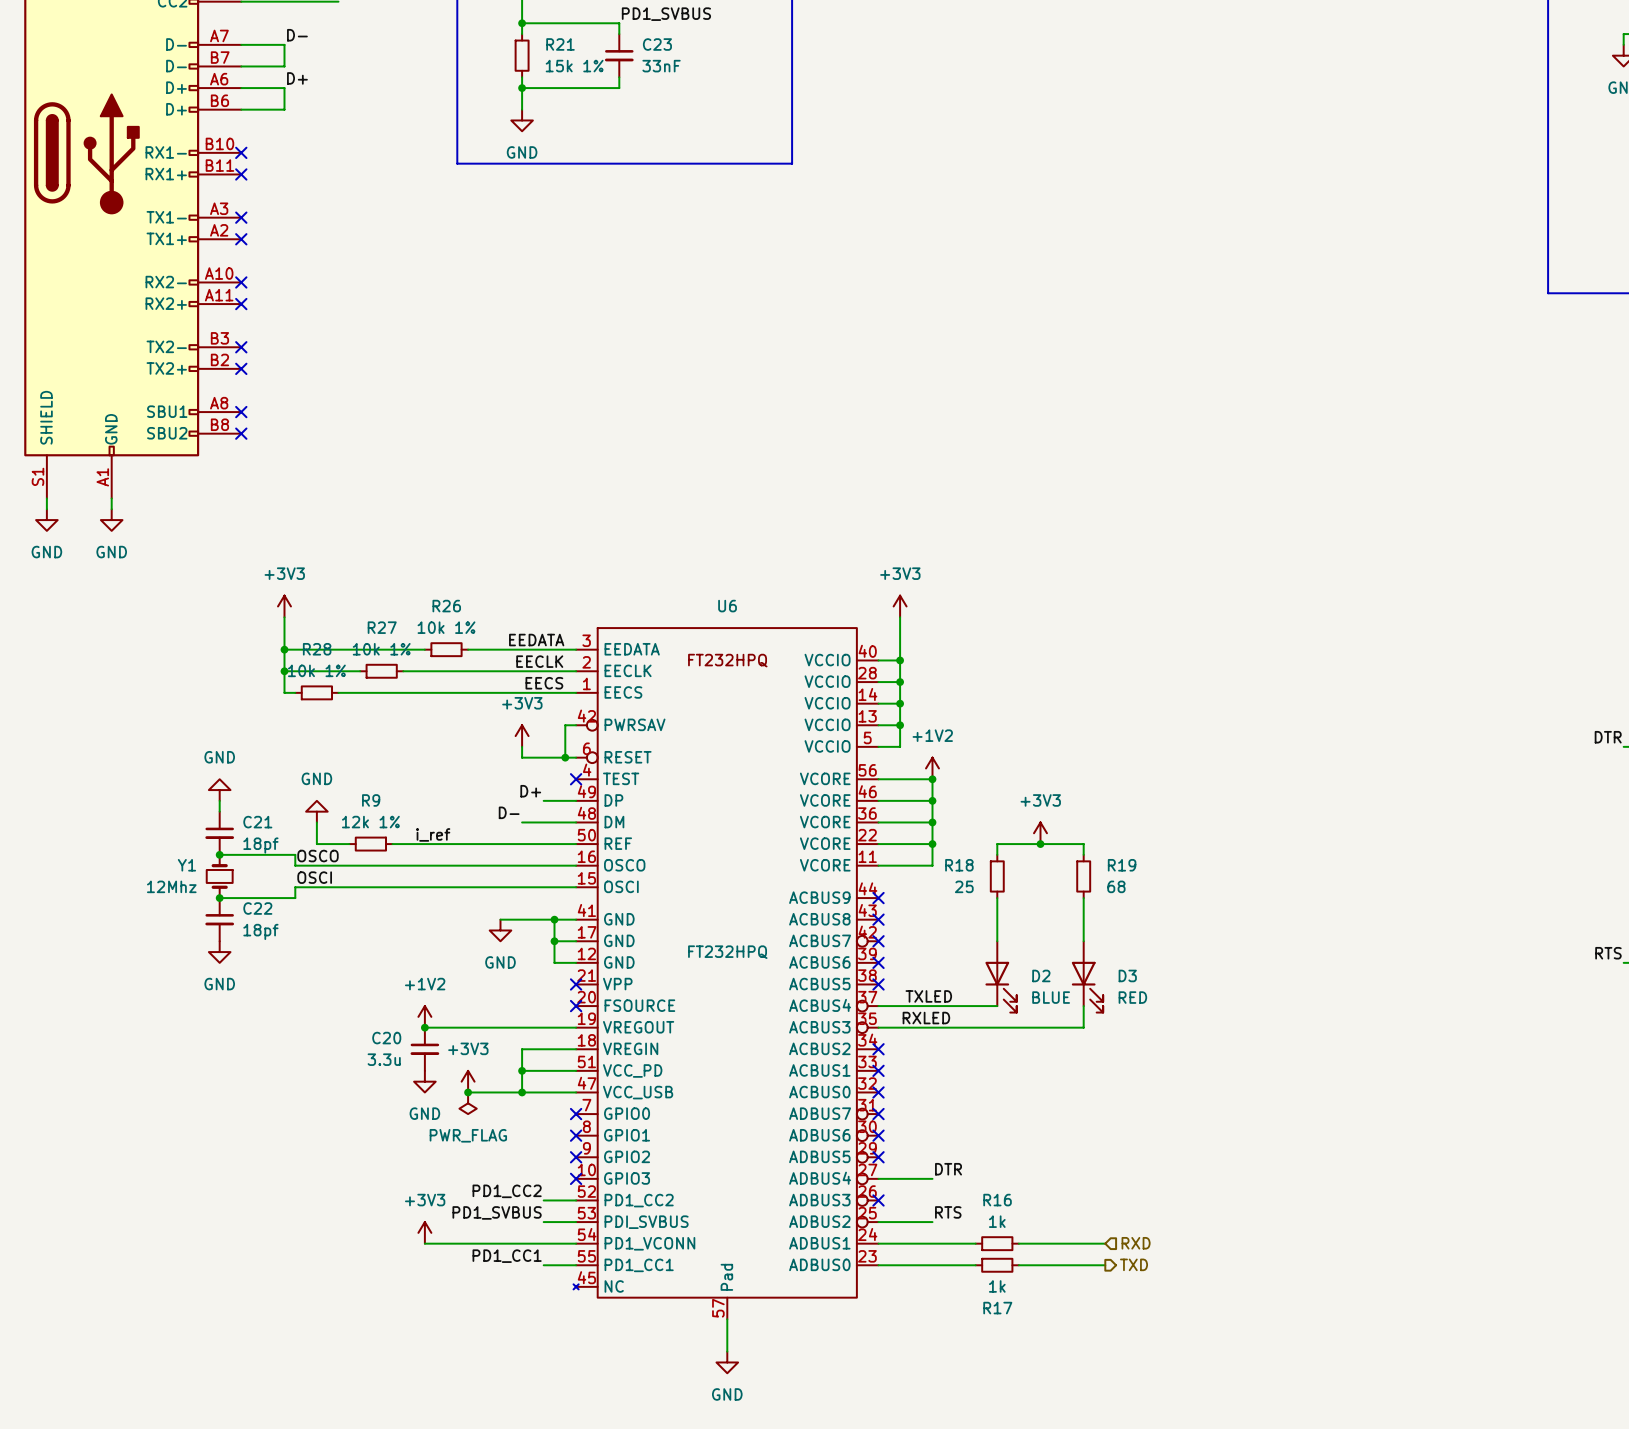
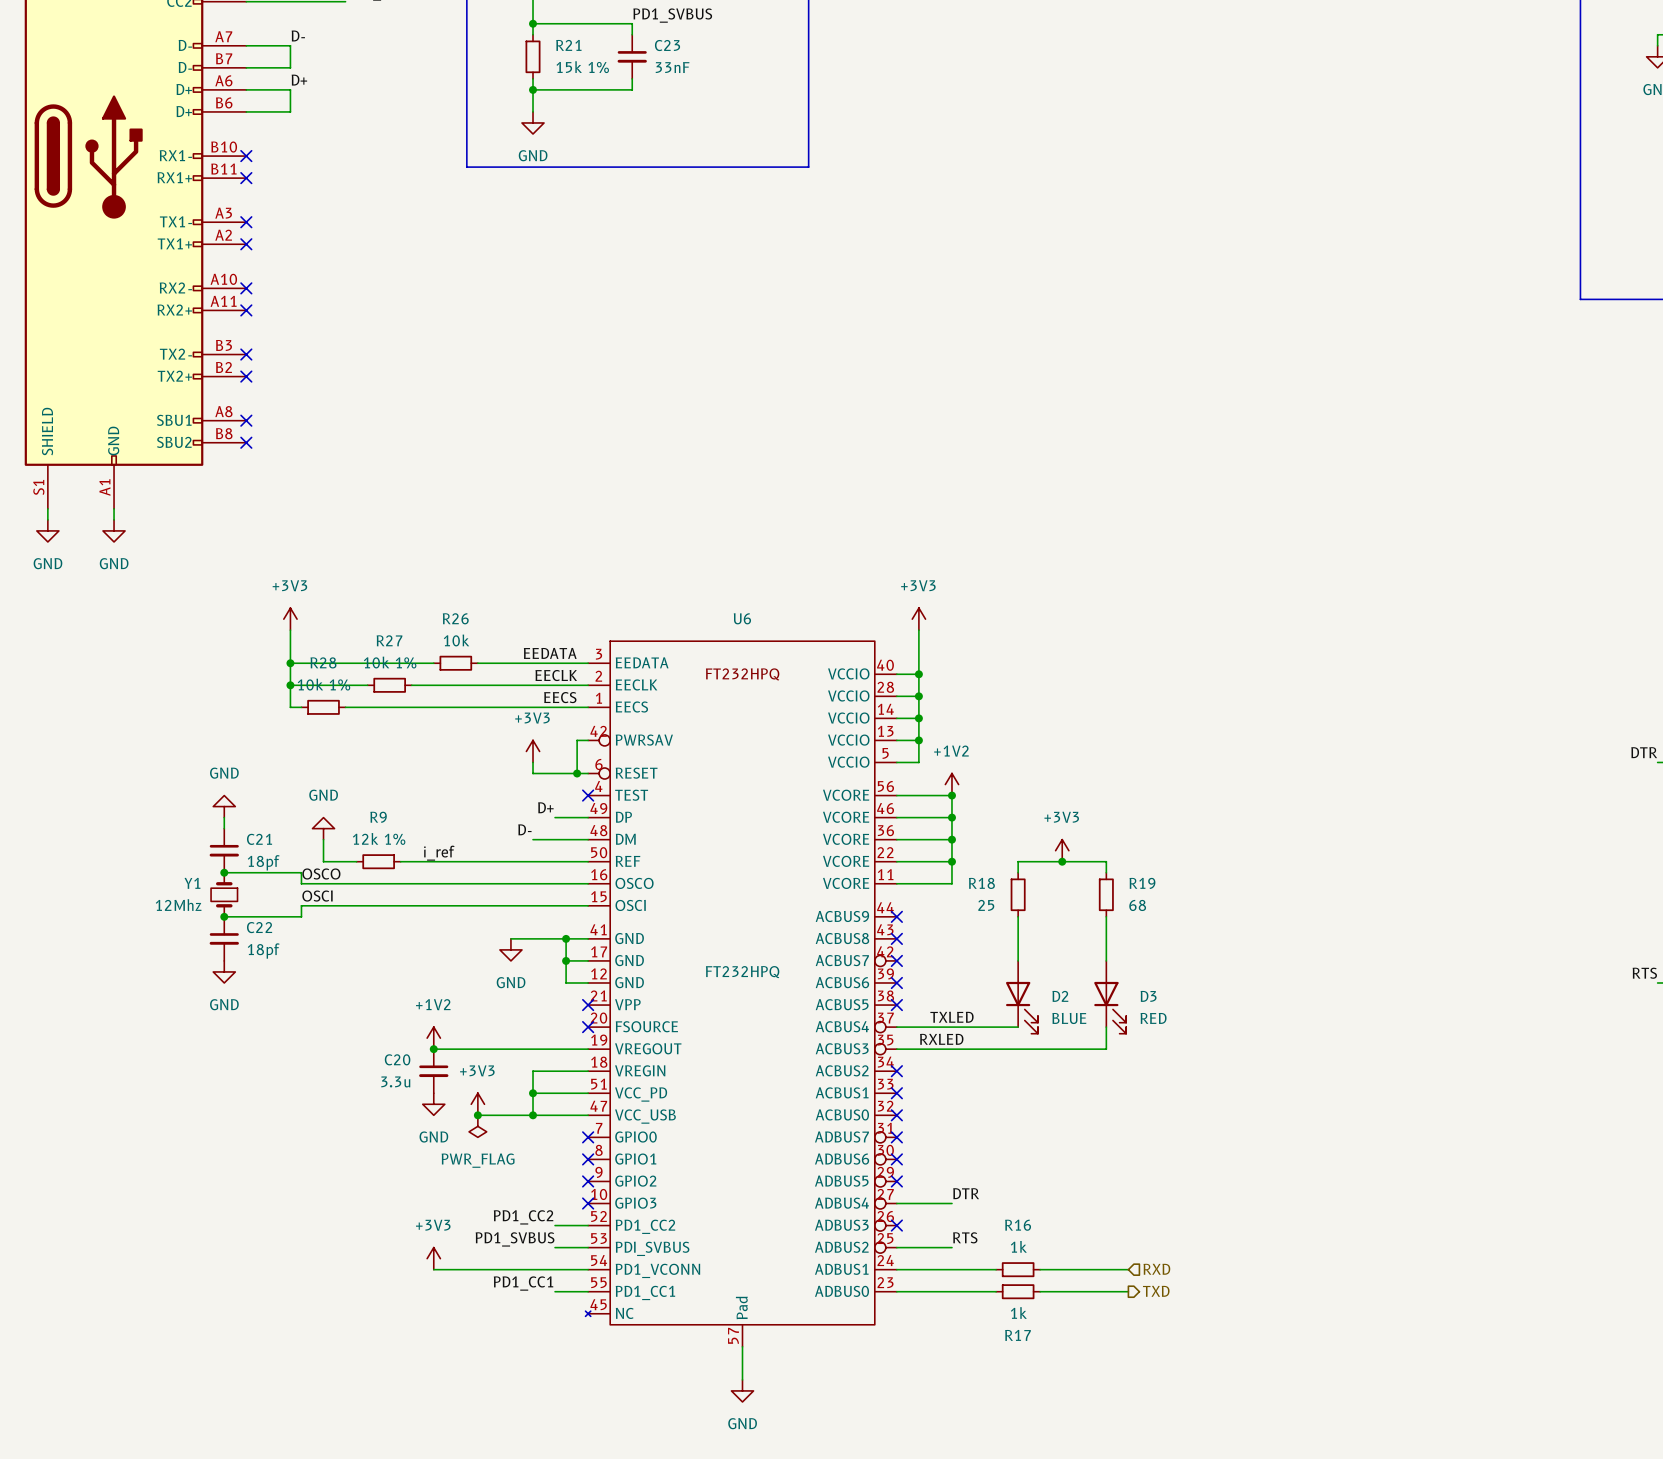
R26 value: 10k 1% (446, 627) -> 10k (456, 640)

